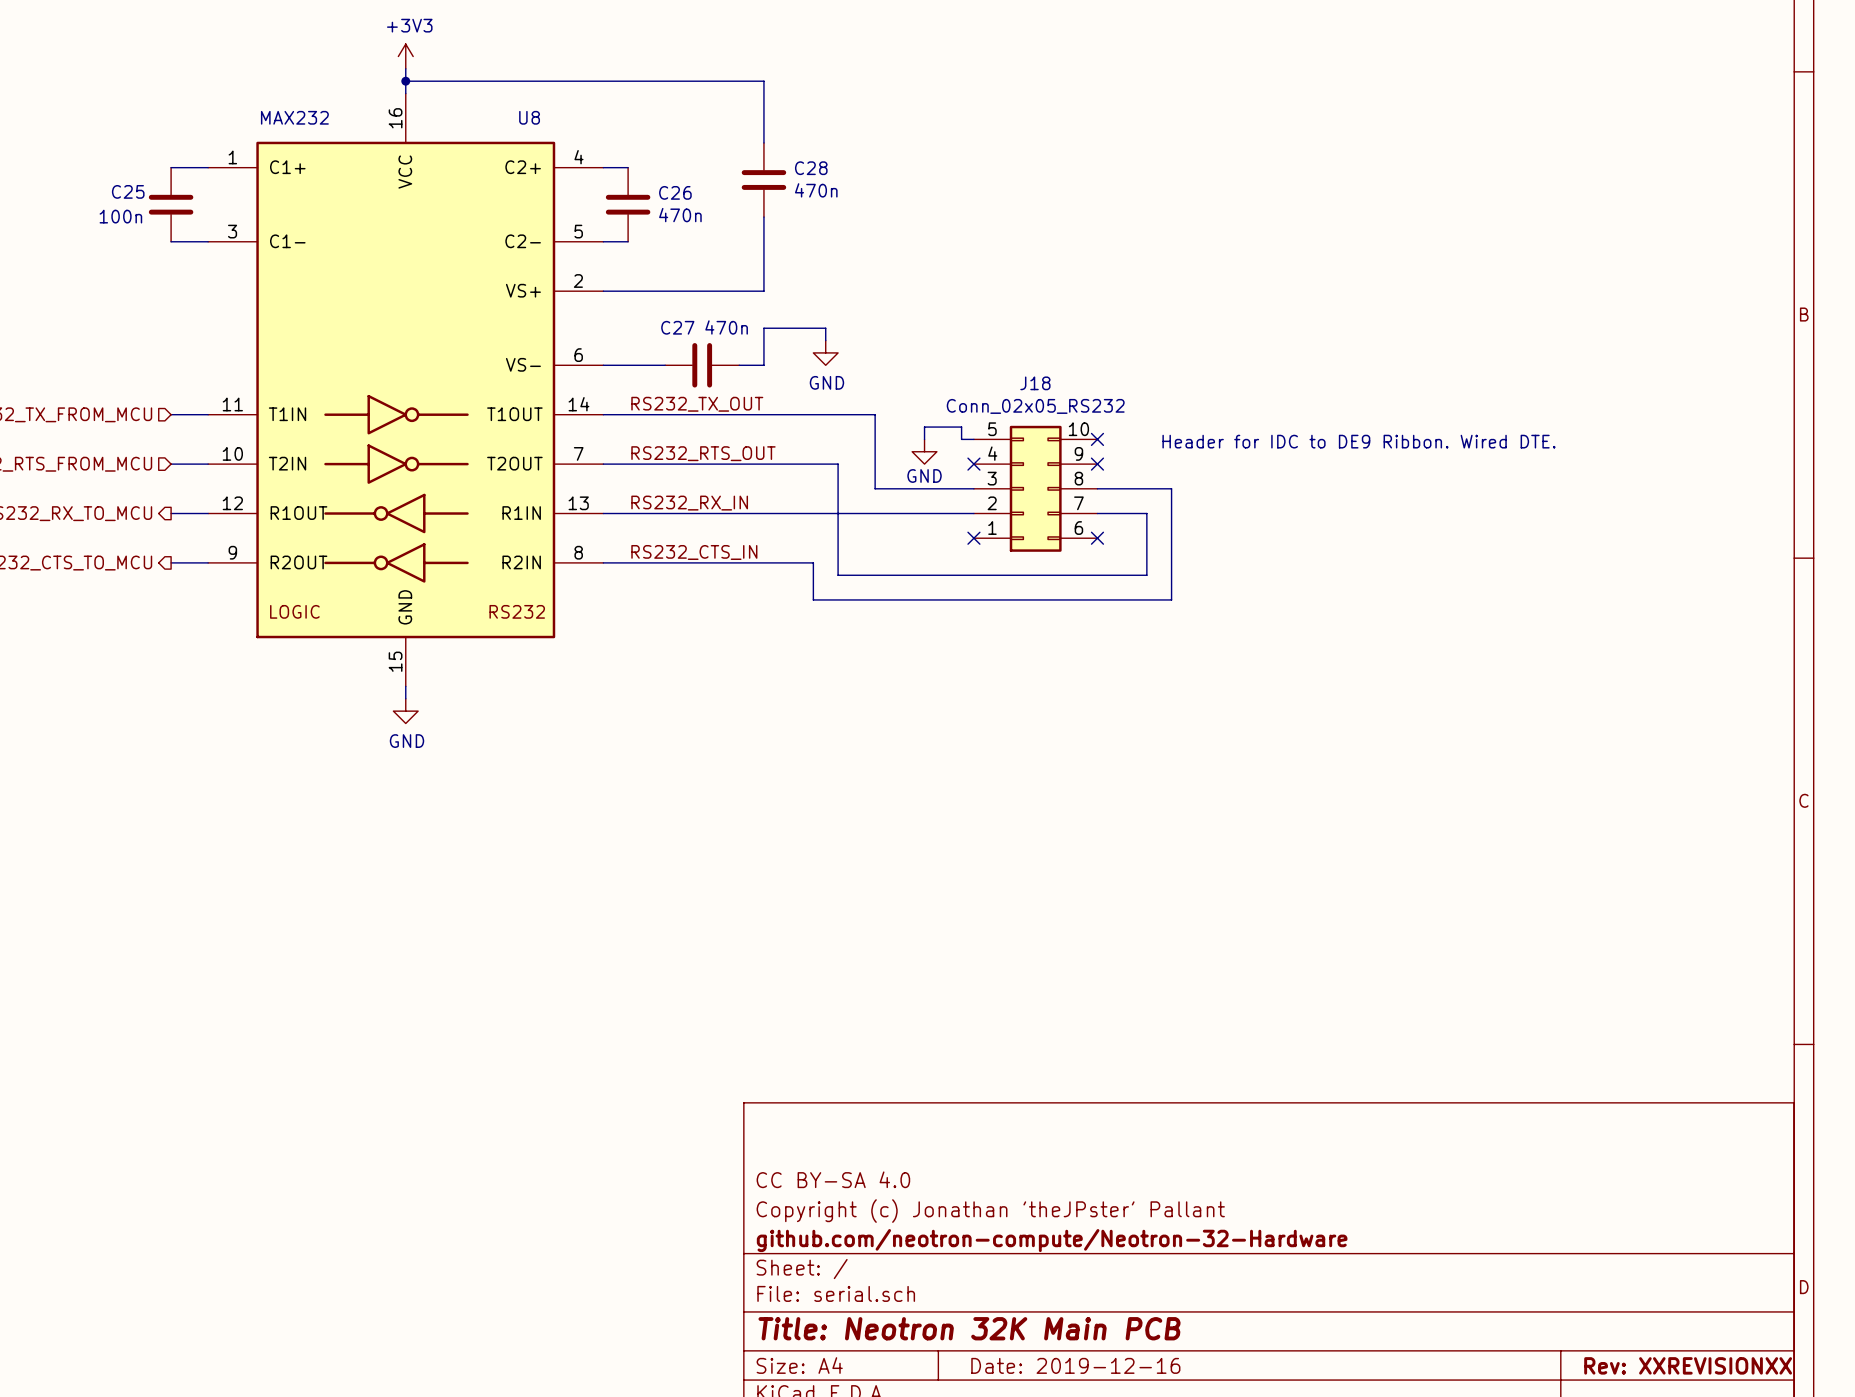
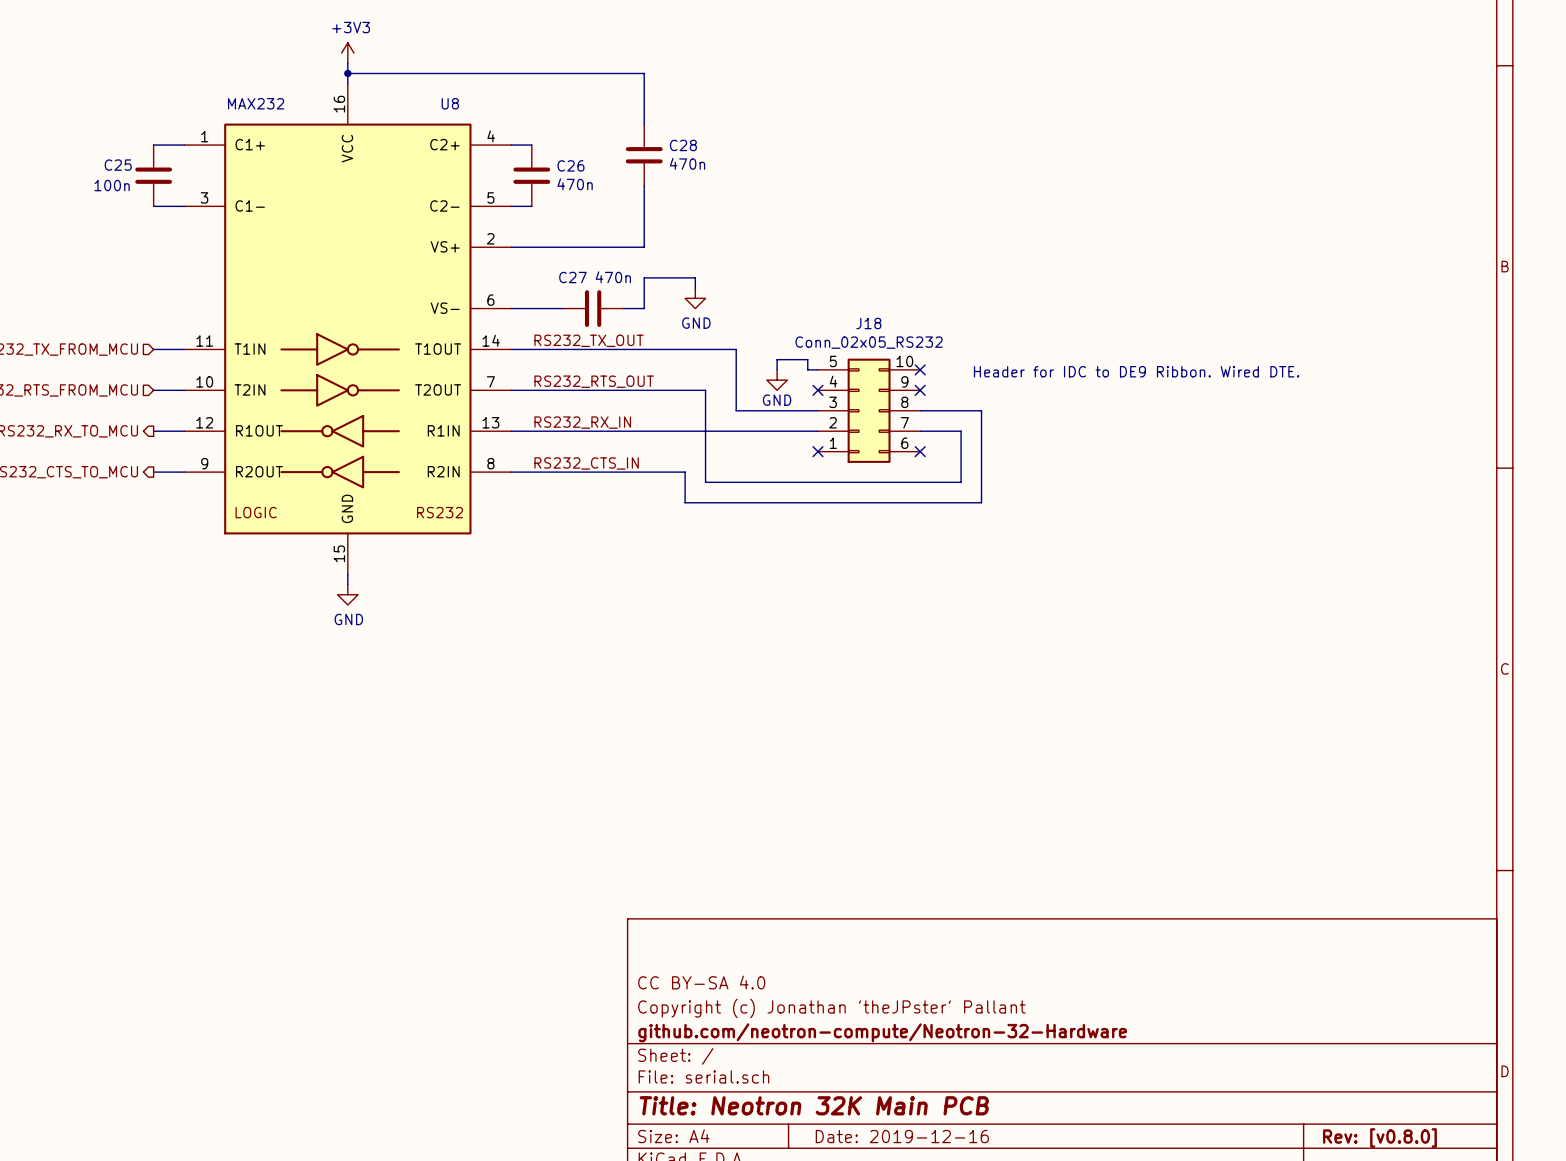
title block: Rev: XXREVISIONXX (1688, 1365) -> Rev: [v0.8.0] (1379, 1137)

